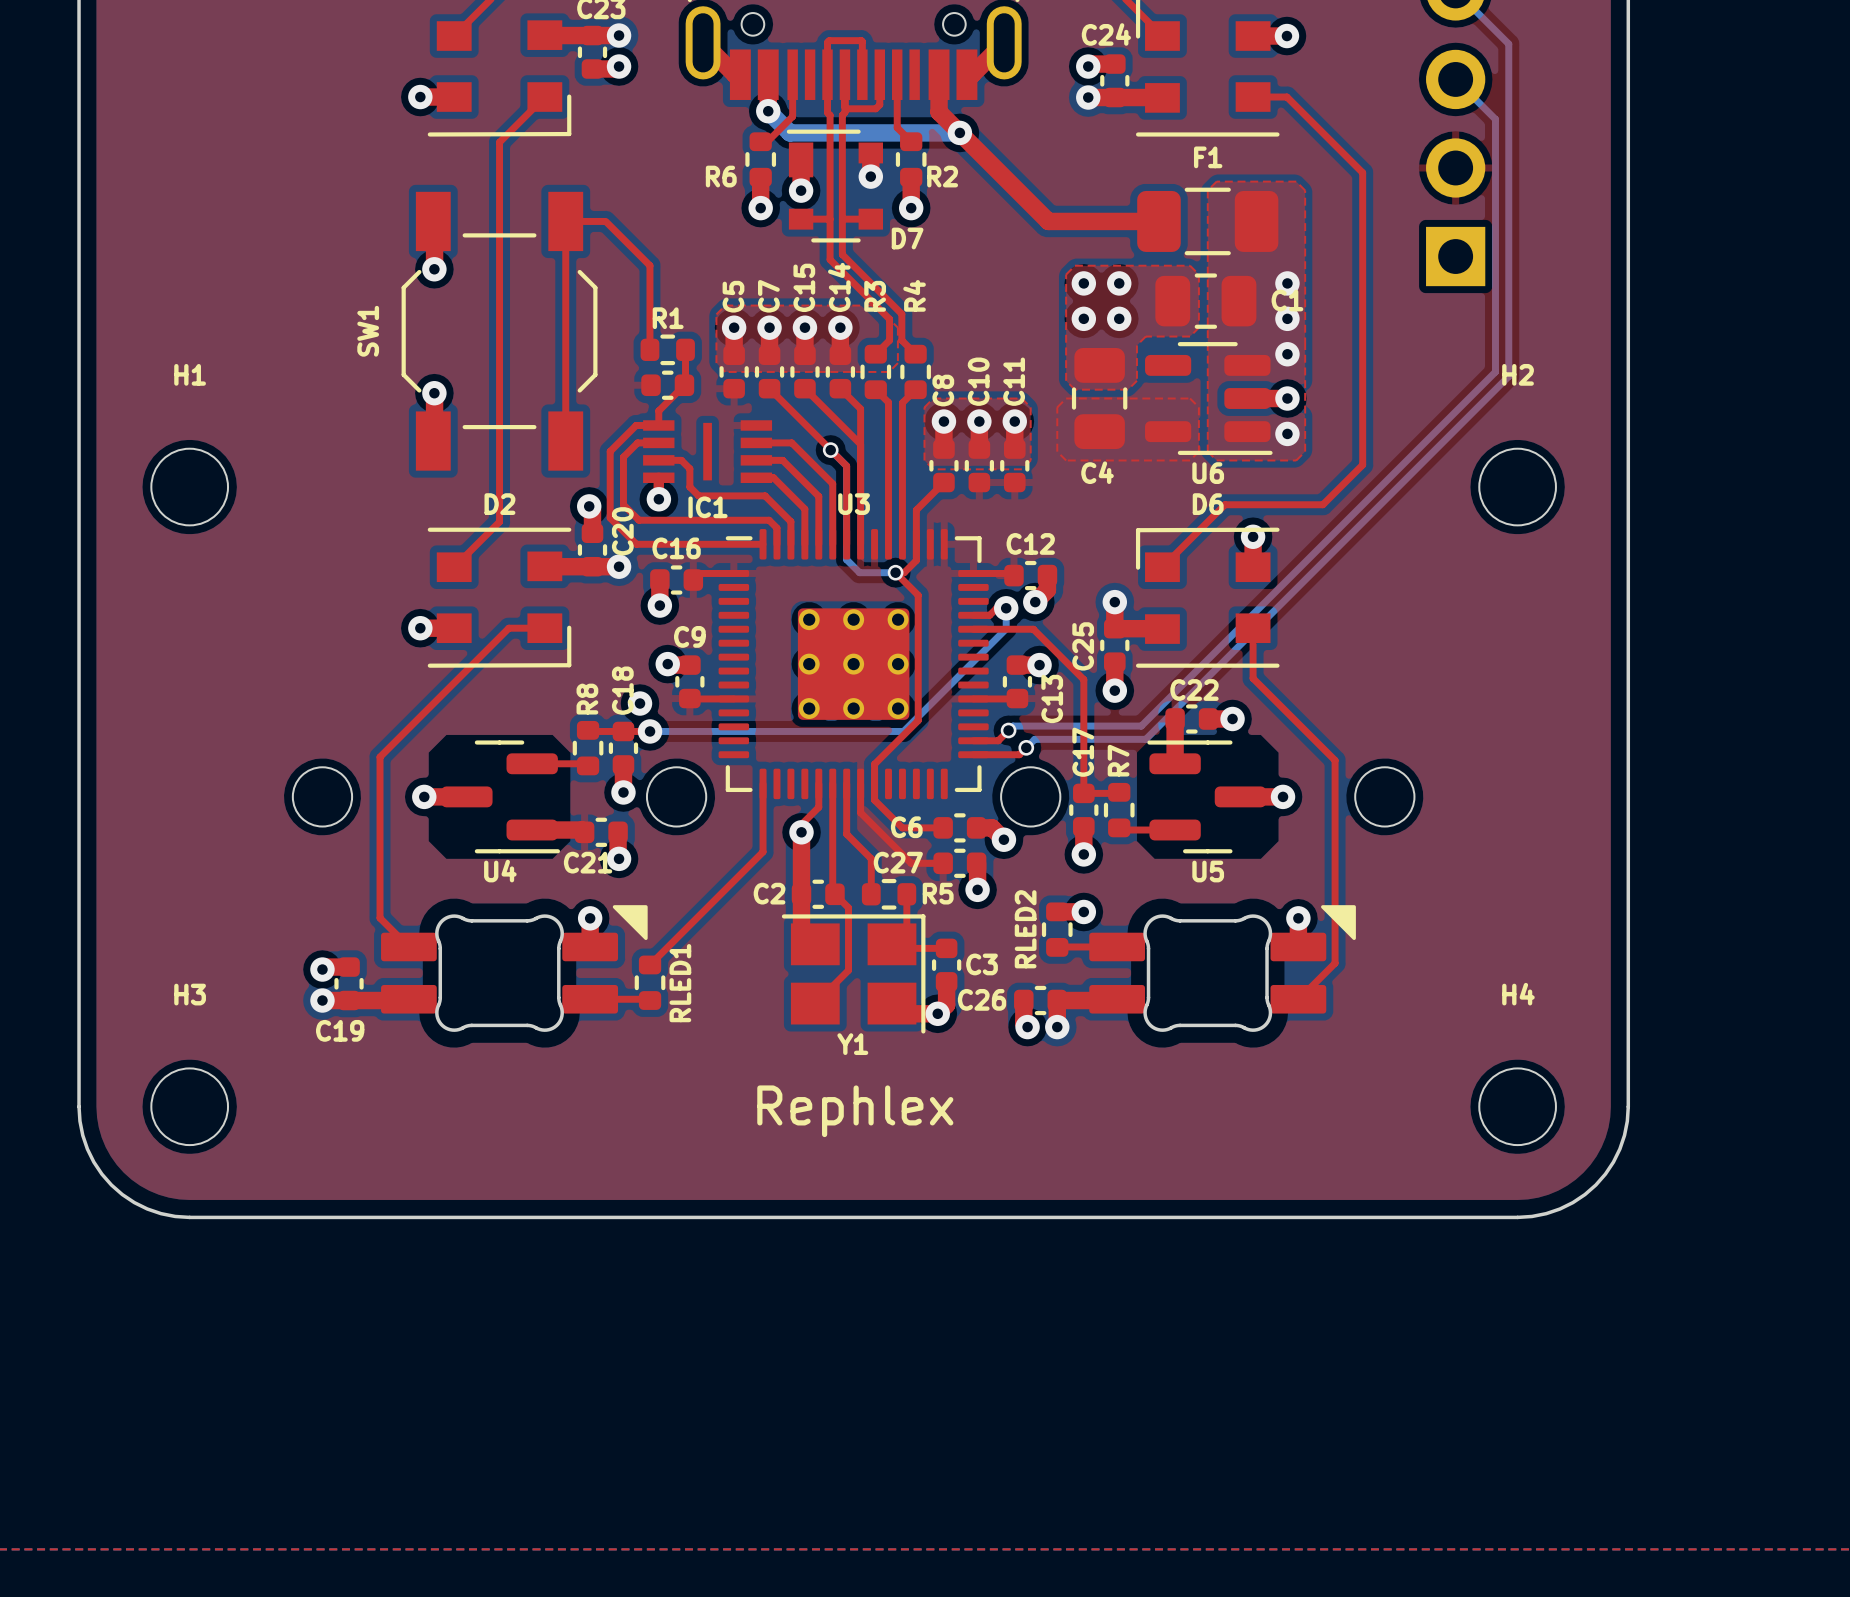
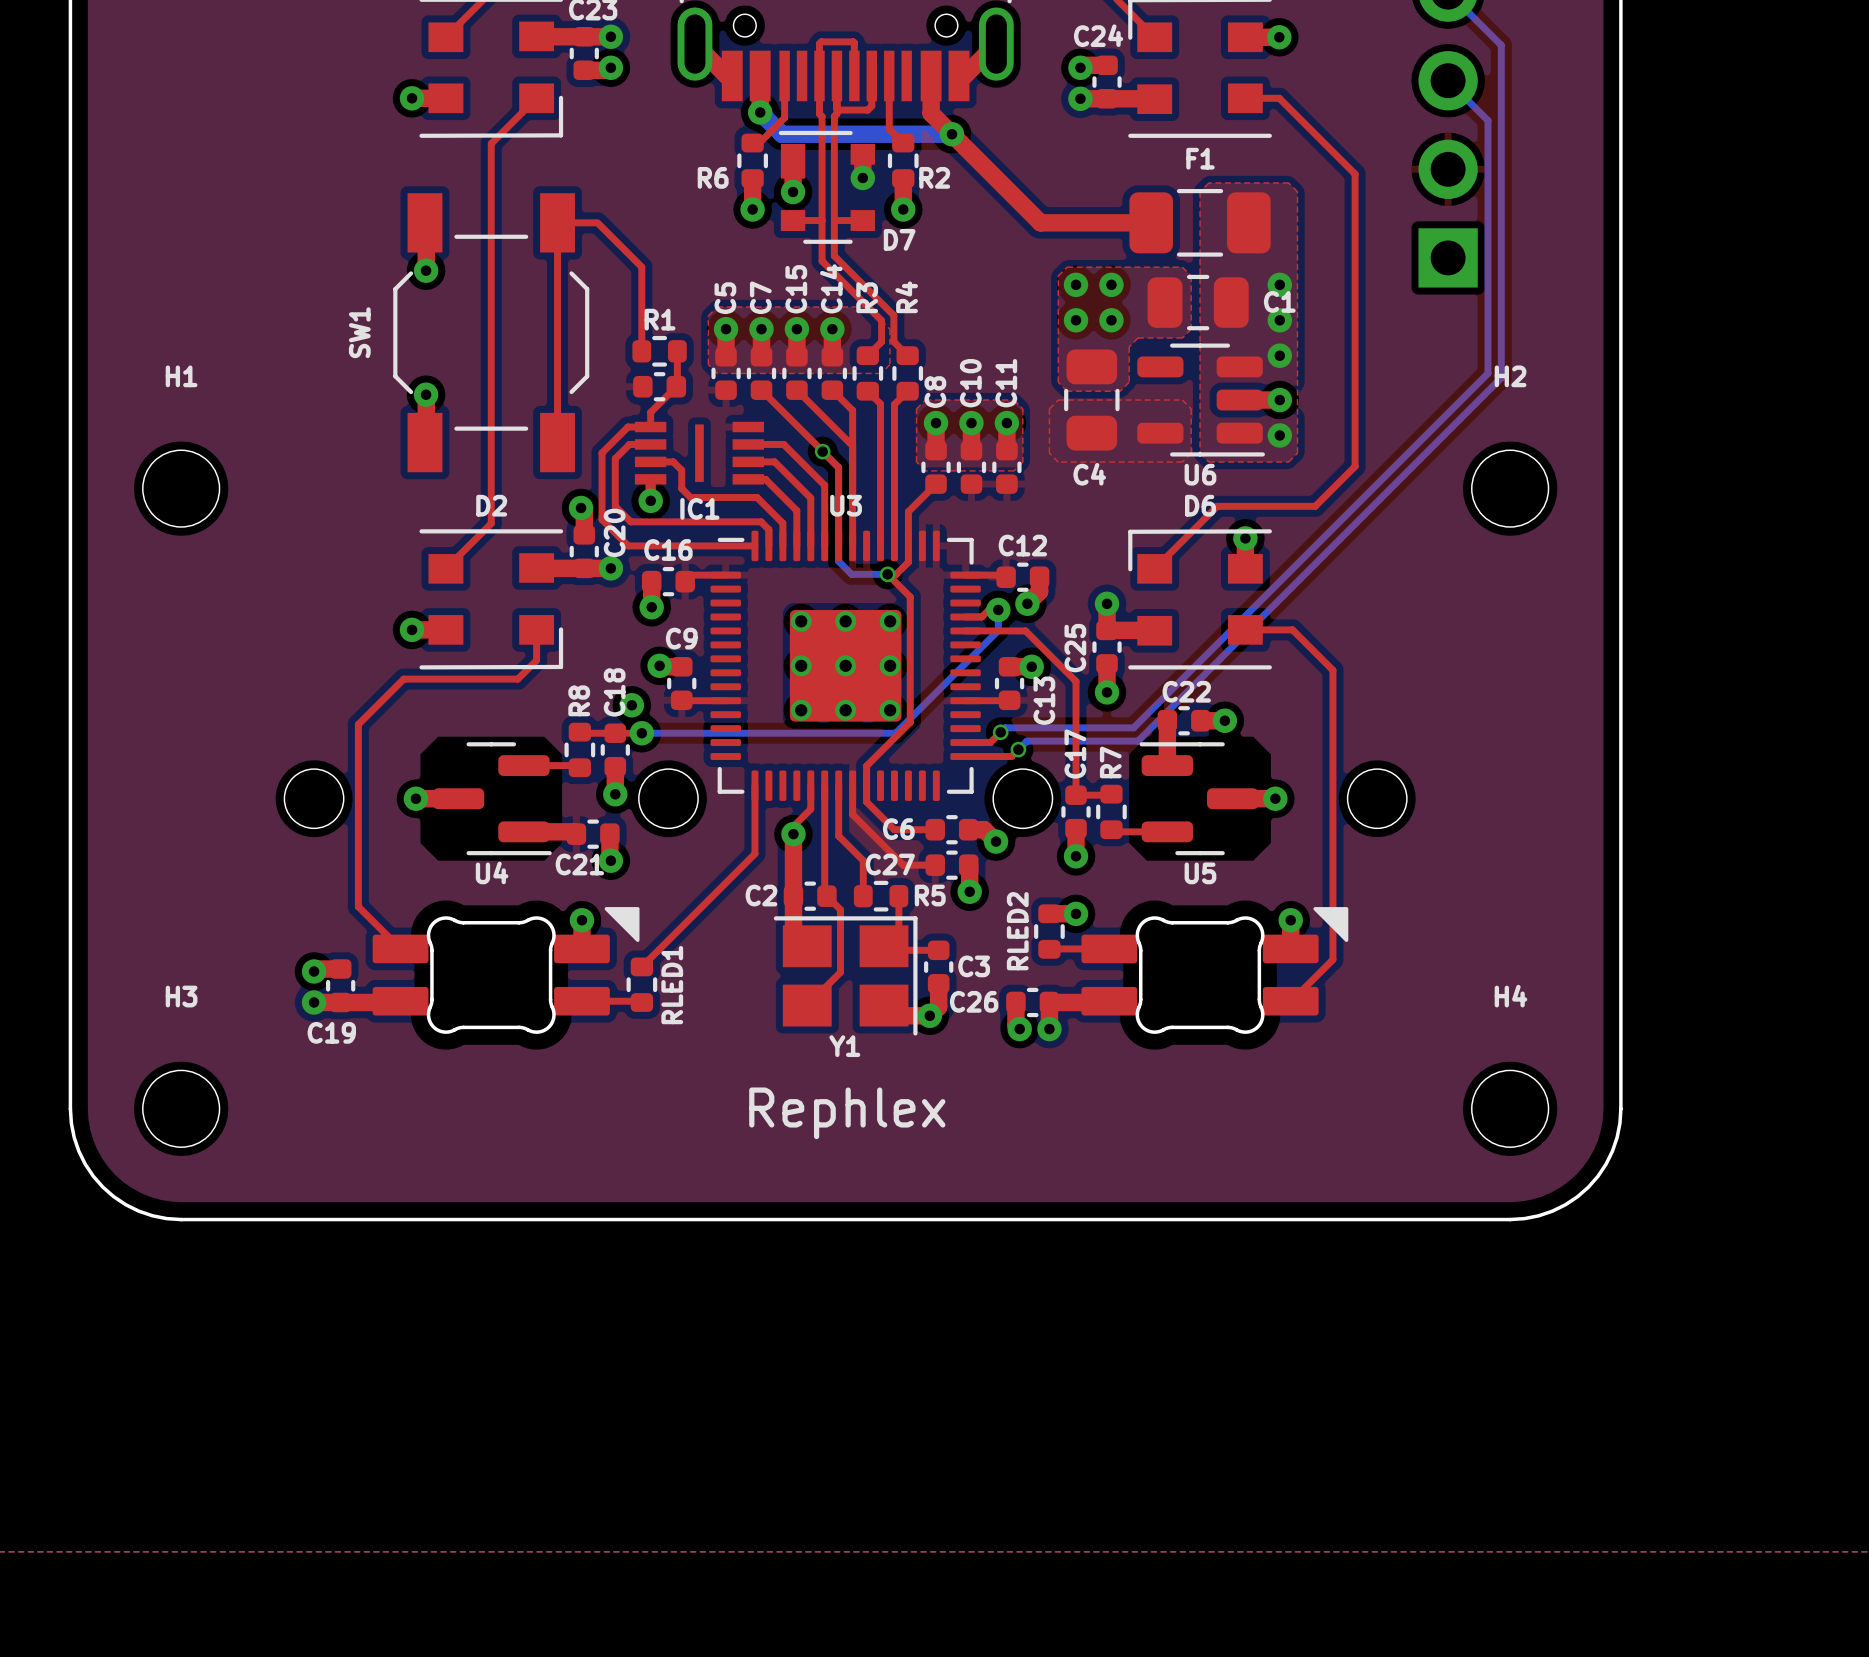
top track: (544, 628) (508, 628) (380, 757) (380, 918) -> (536, 629) (536, 660) (517, 679) (403, 679) (358, 724) (358, 906) (371, 920)
top track: (1253, 628) (1253, 678) (1335, 760) (1335, 963) -> (1245, 629) (1292, 629) (1332, 670) (1332, 959) (1327, 965)

